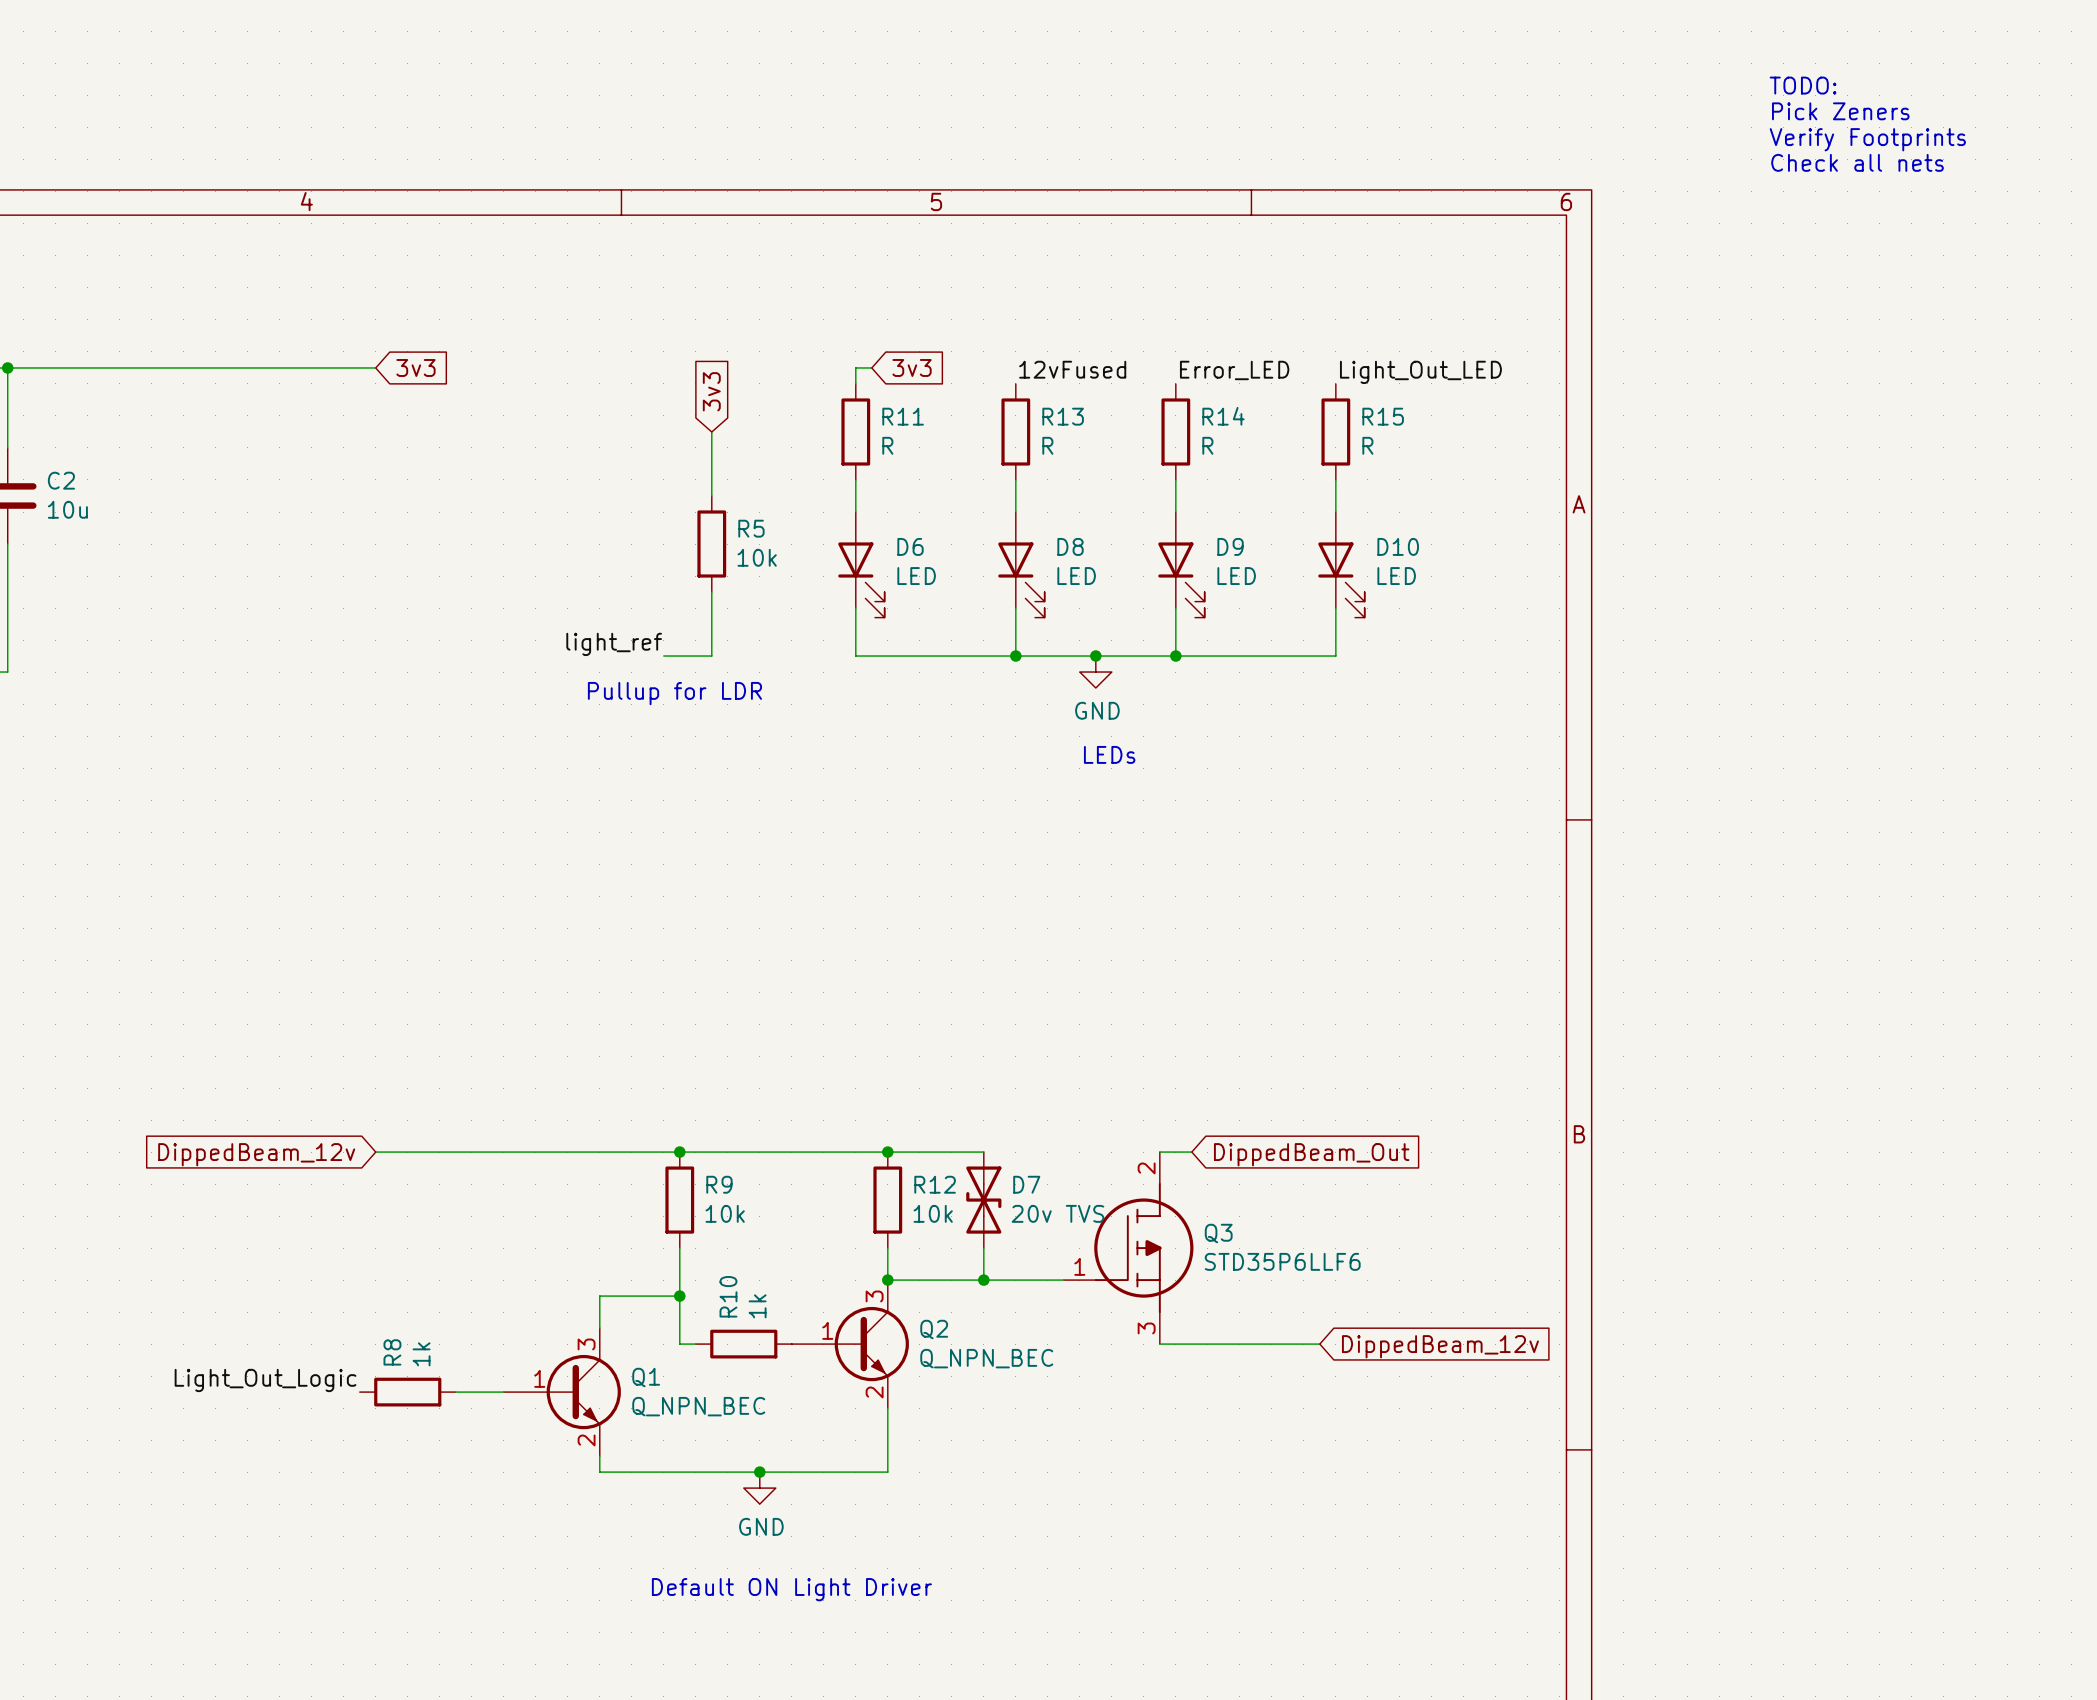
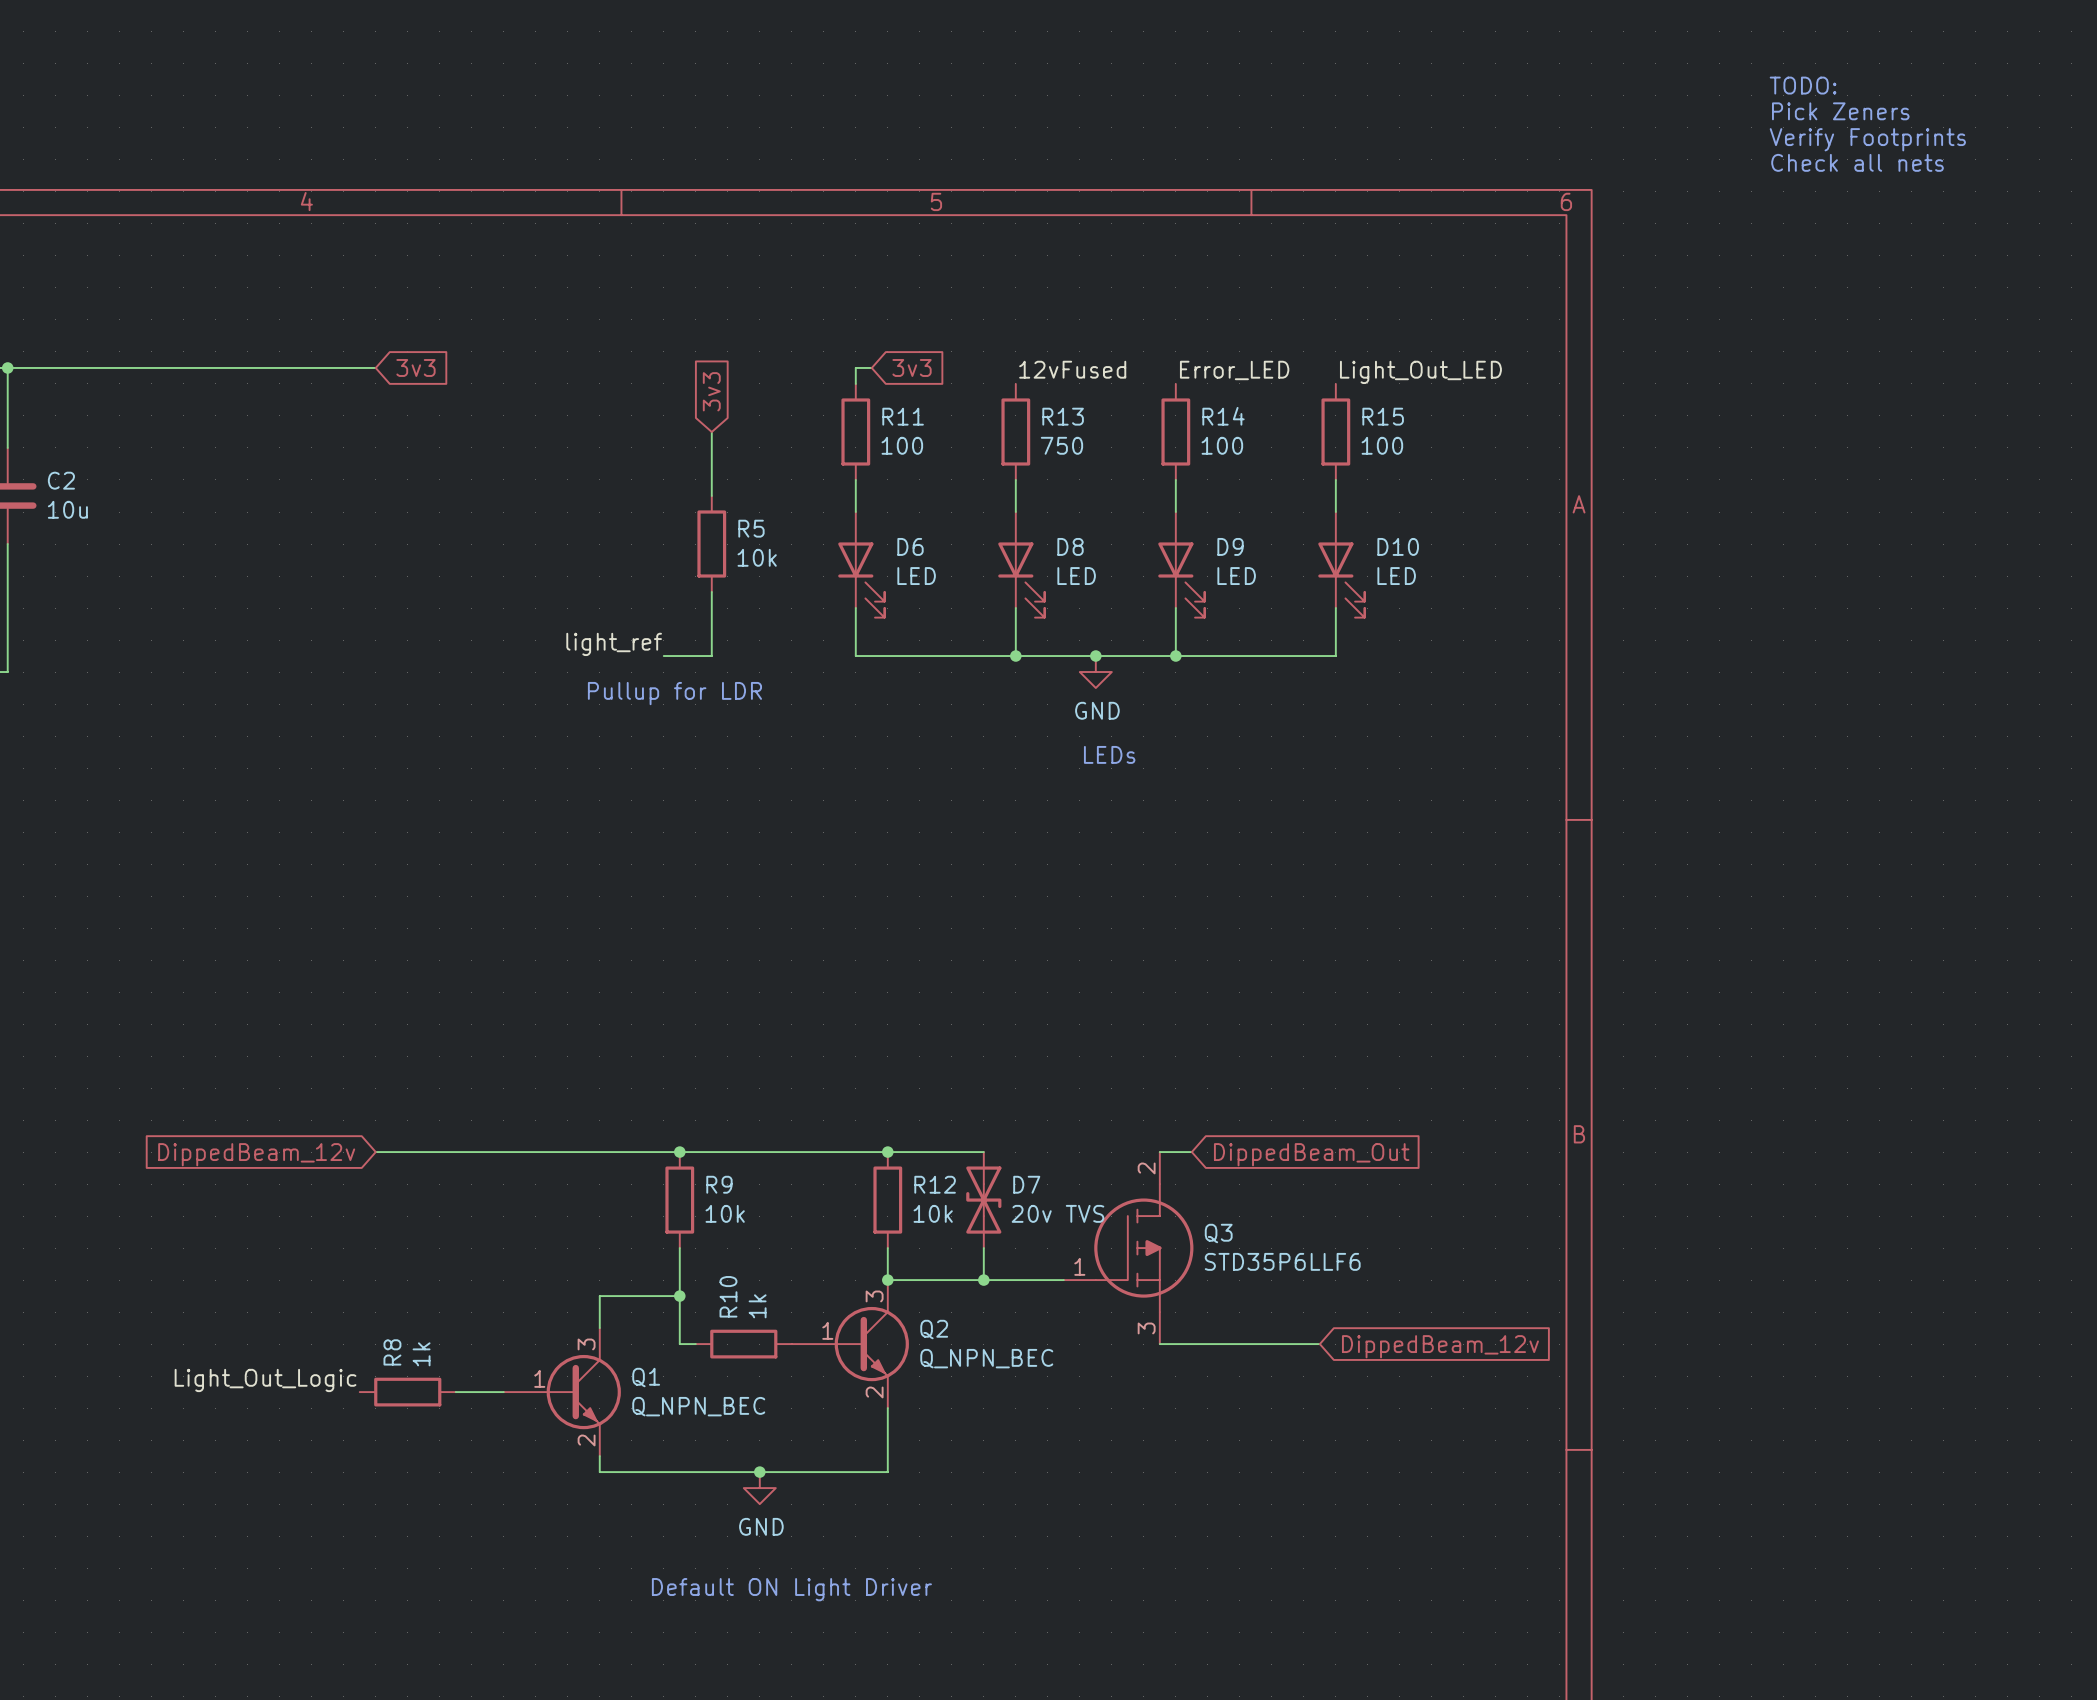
R11 value: R (887, 445) -> 100 (902, 445)
R13 value: R (1047, 445) -> 750 (1061, 445)
R14 value: R (1207, 445) -> 100 (1222, 445)
R15 value: R (1367, 445) -> 100 (1382, 445)

